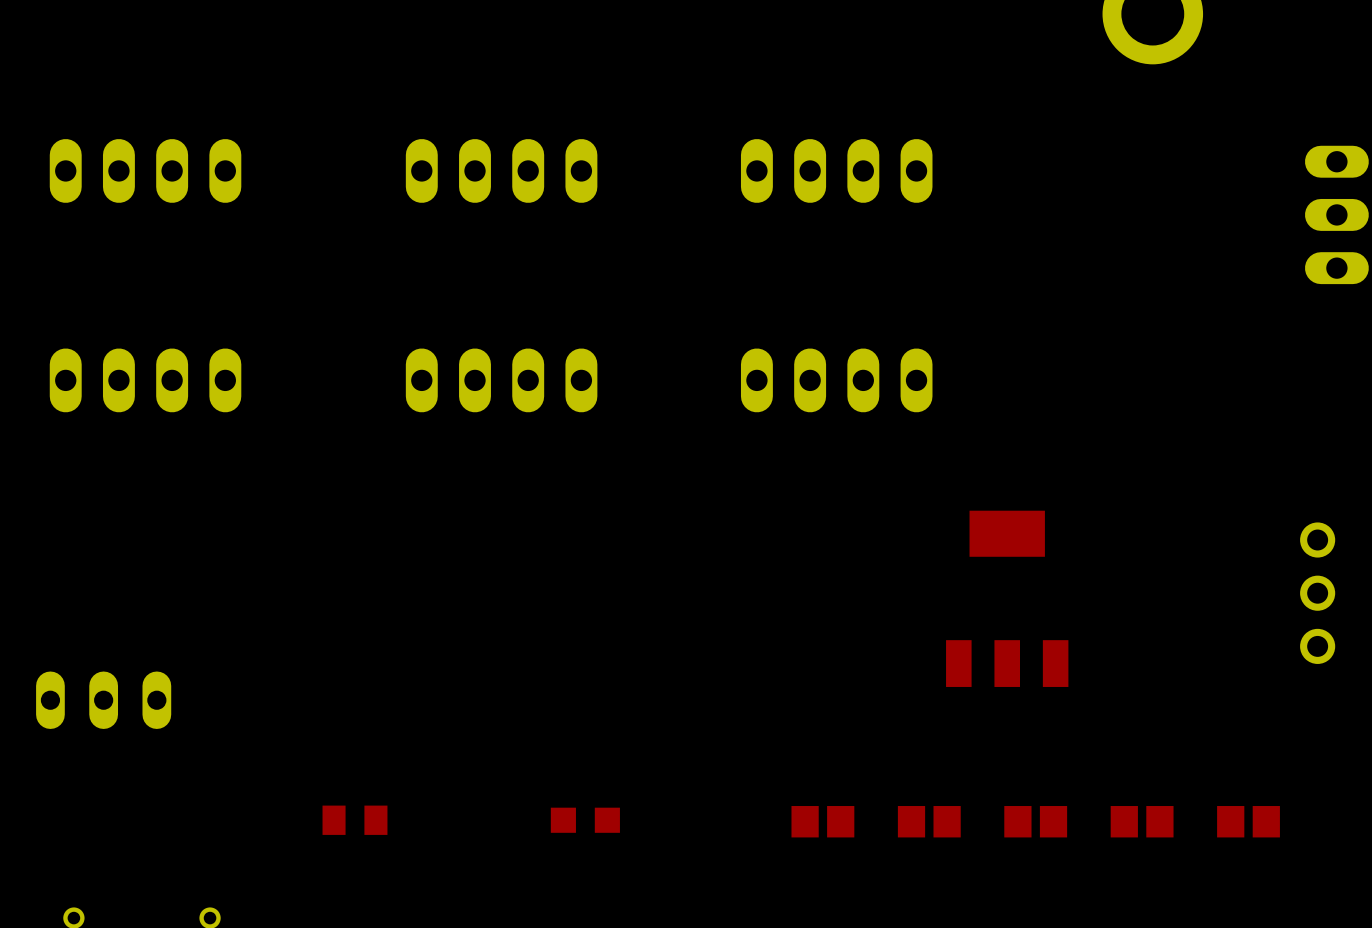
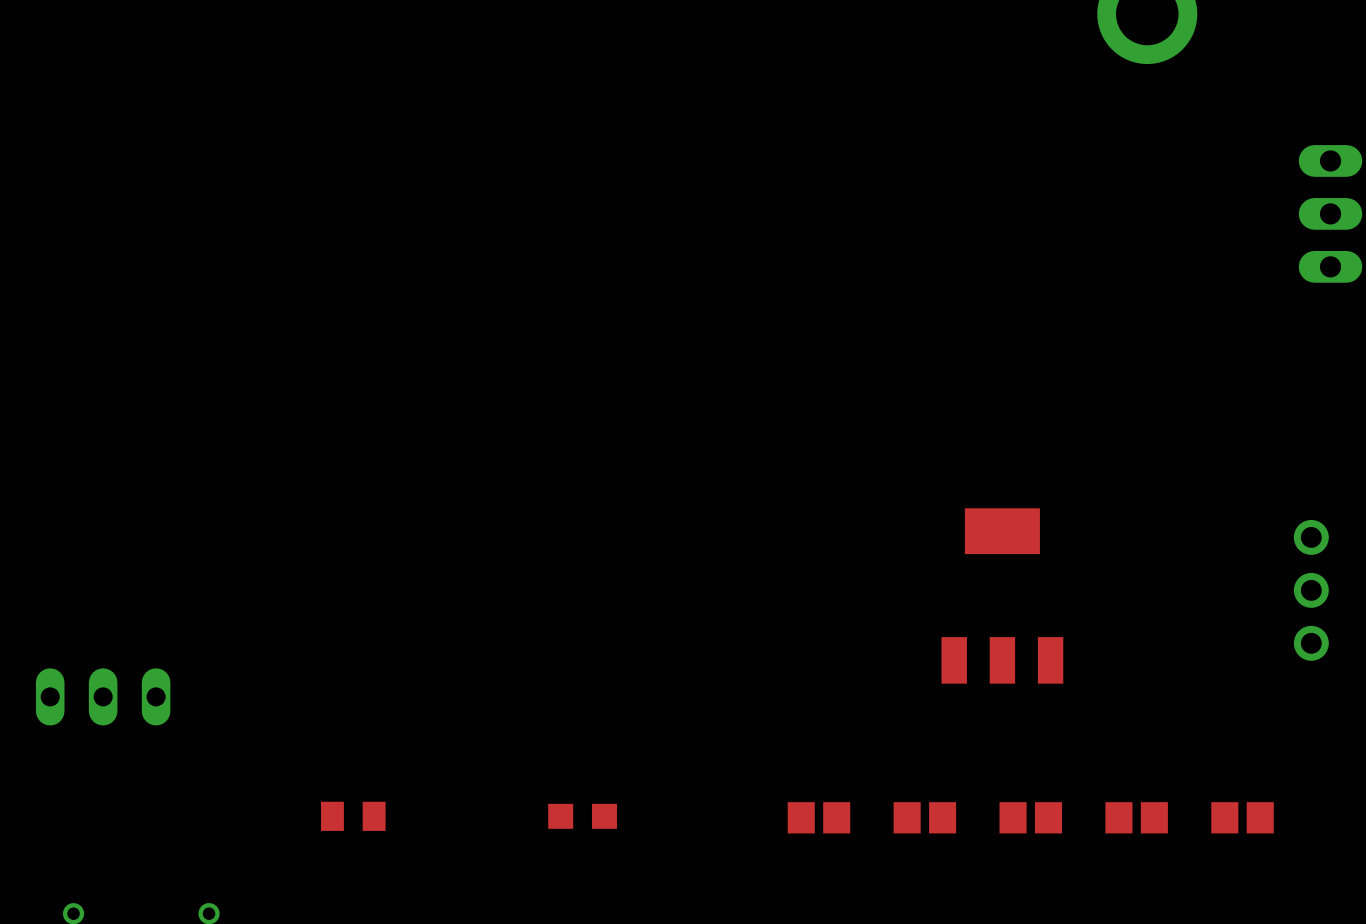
part: (145, 170) -> none
part: (501, 170) -> none
part: (836, 170) -> none
part: (145, 380) -> none
part: (501, 380) -> none
part: (836, 380) -> none

